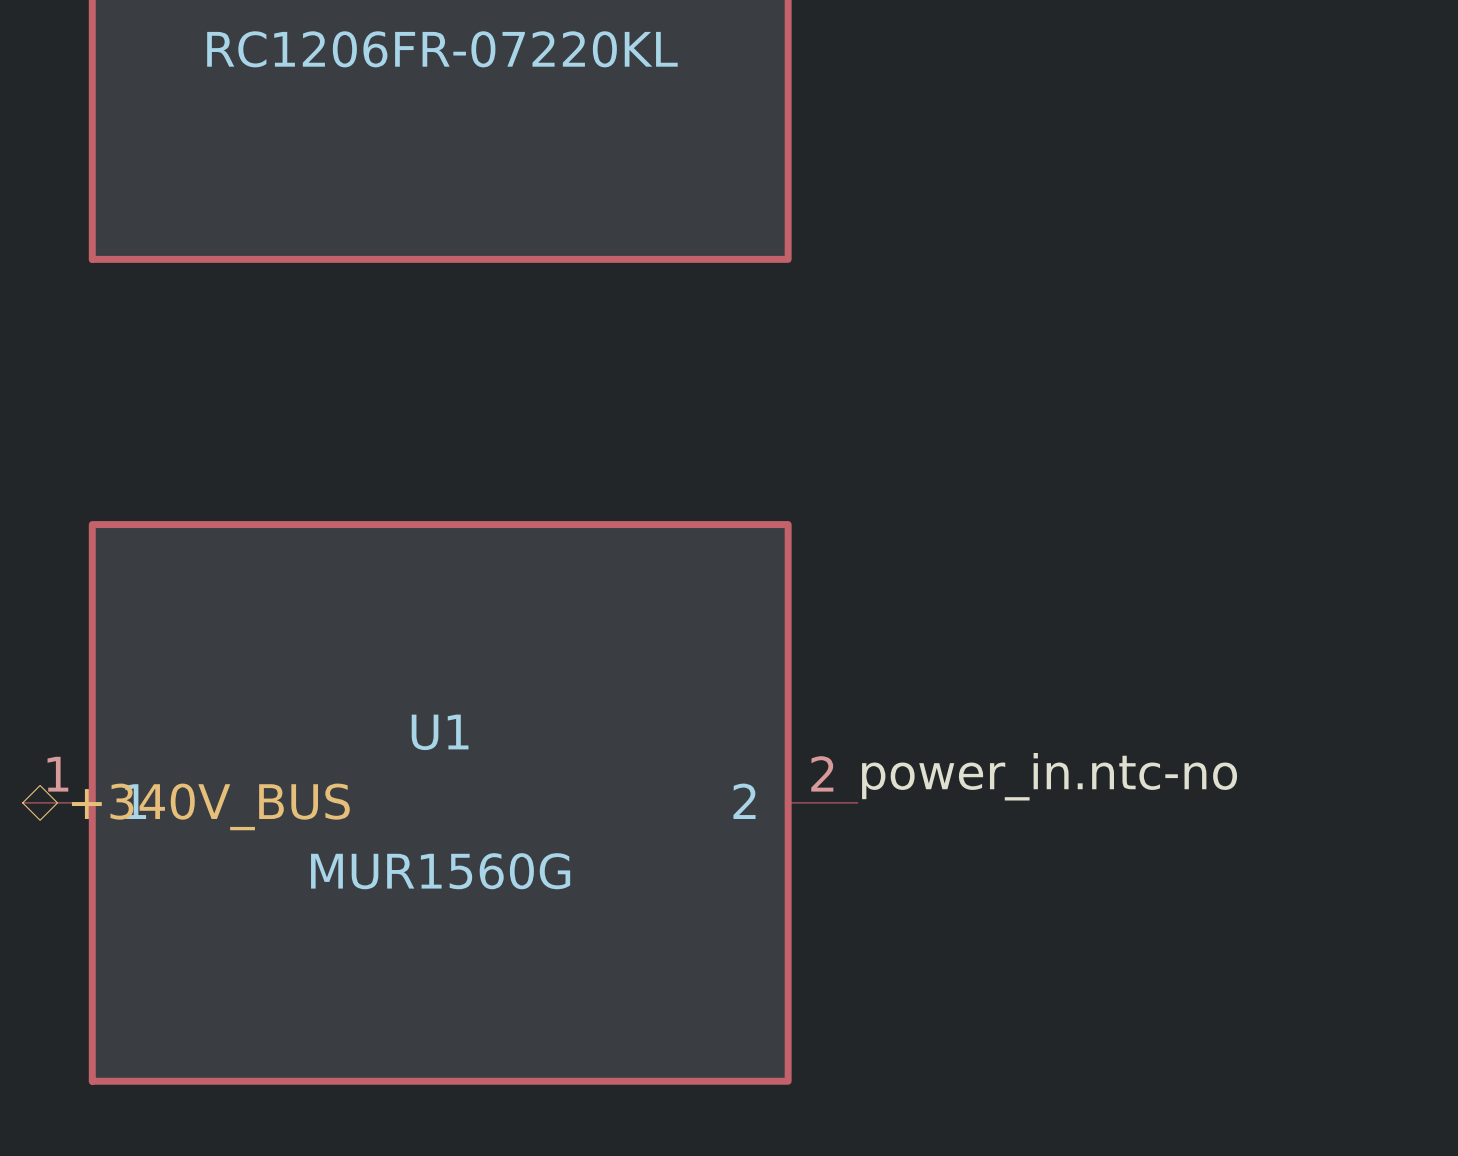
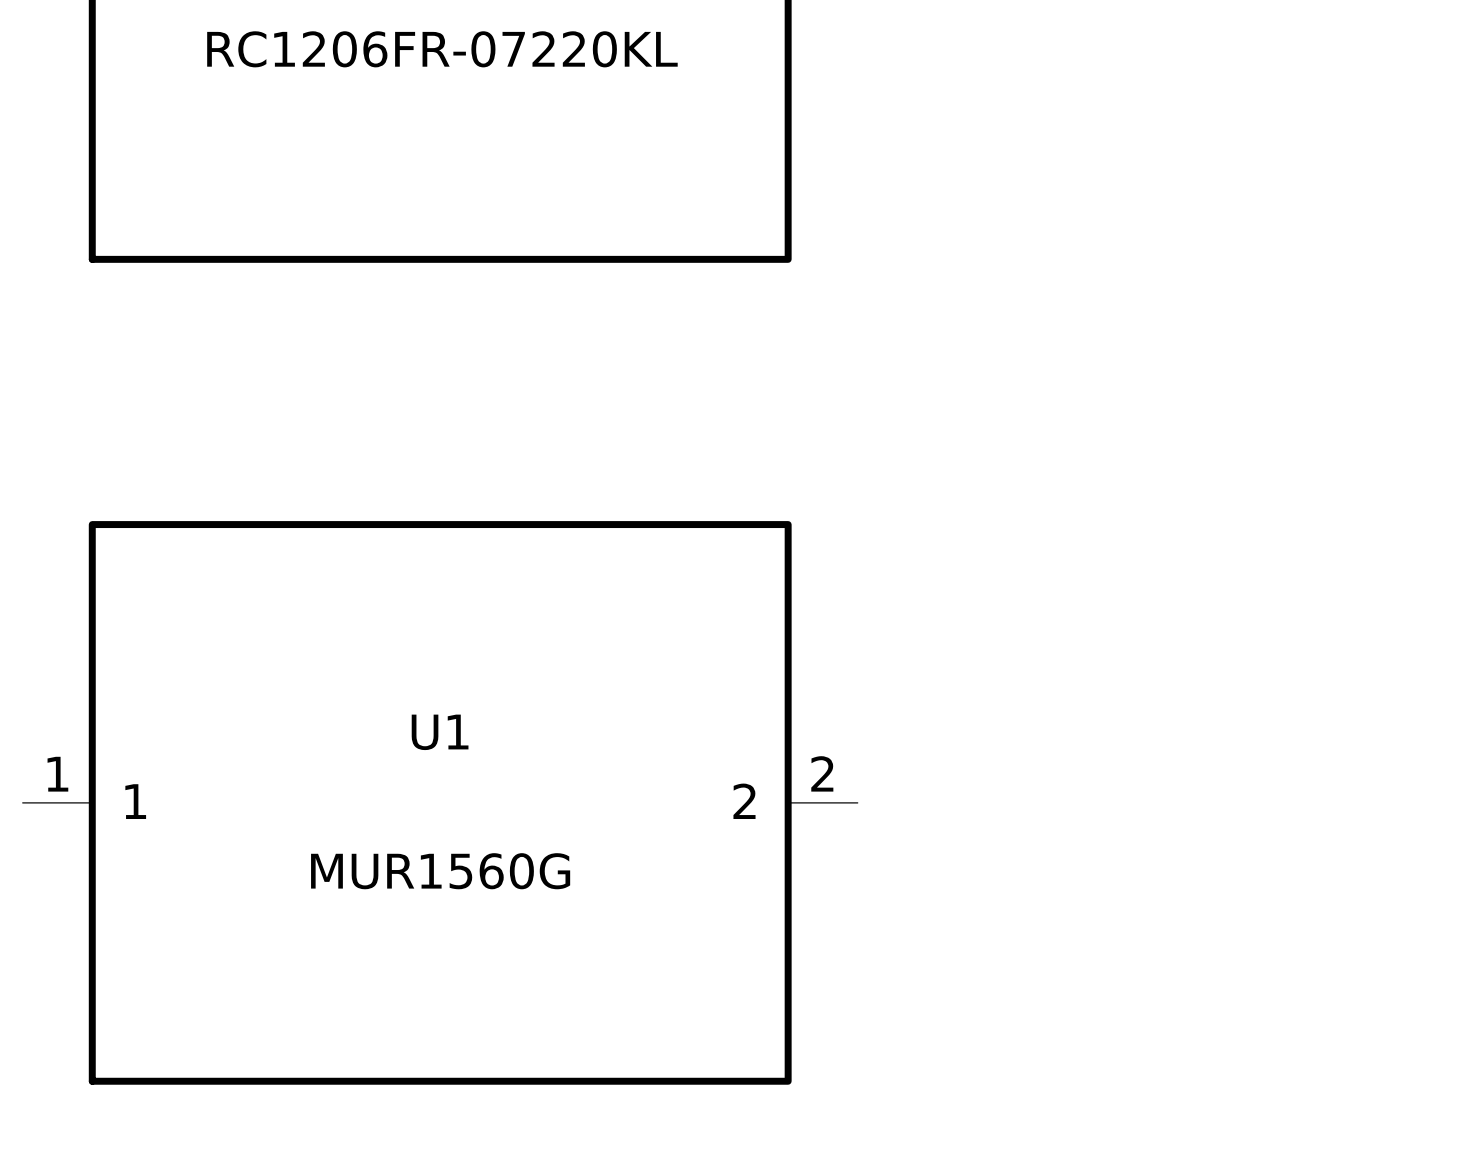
label: power_in.ntc-no (1049, 776) -> none
hierarchical label: +340V_BUS (210, 806) -> none

